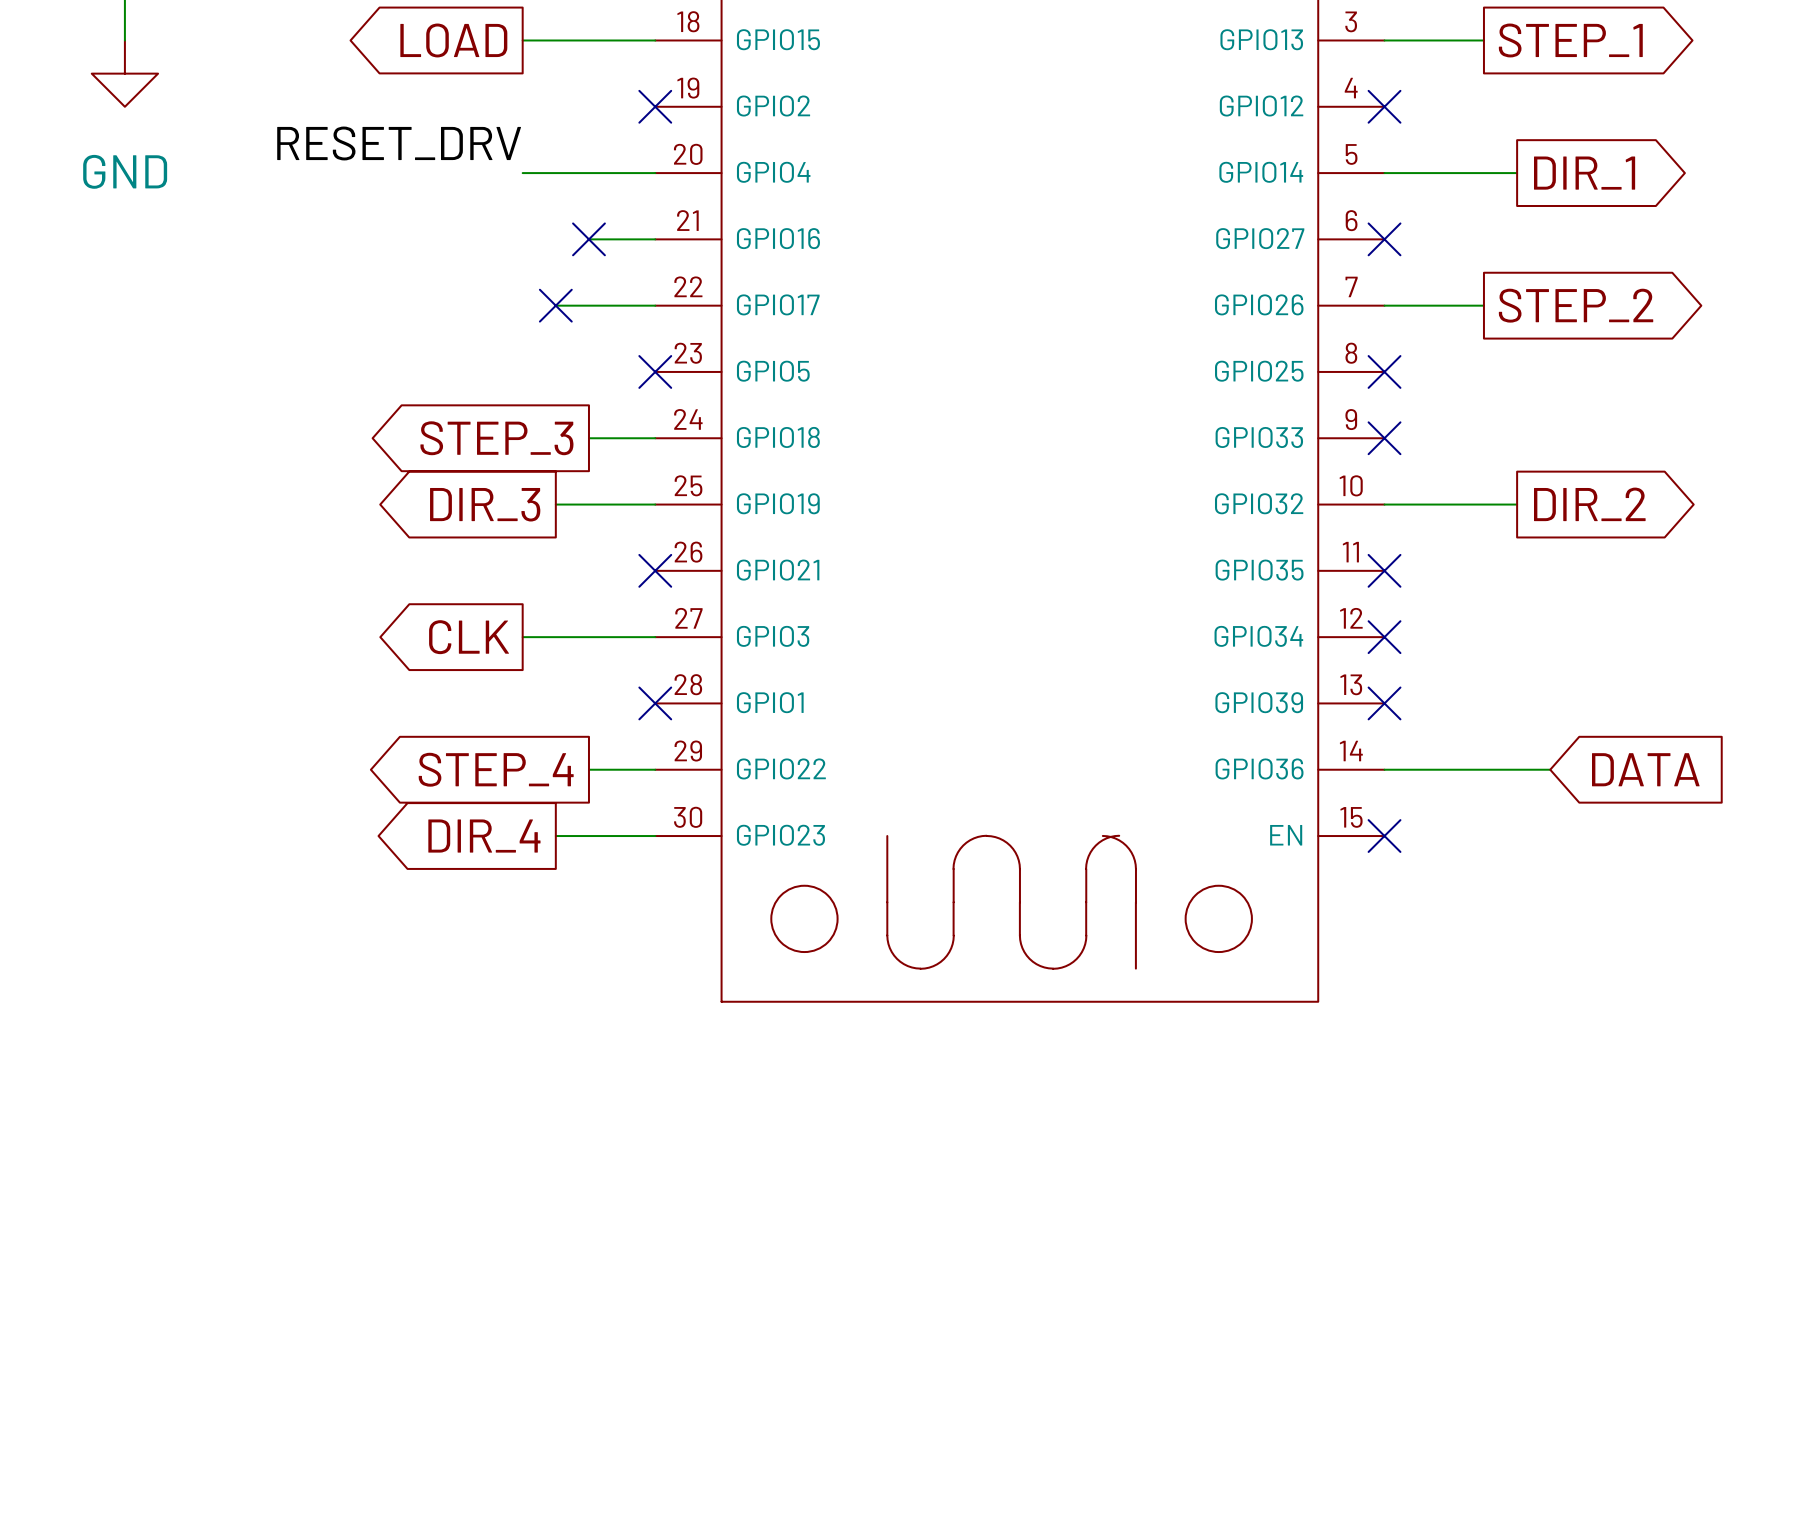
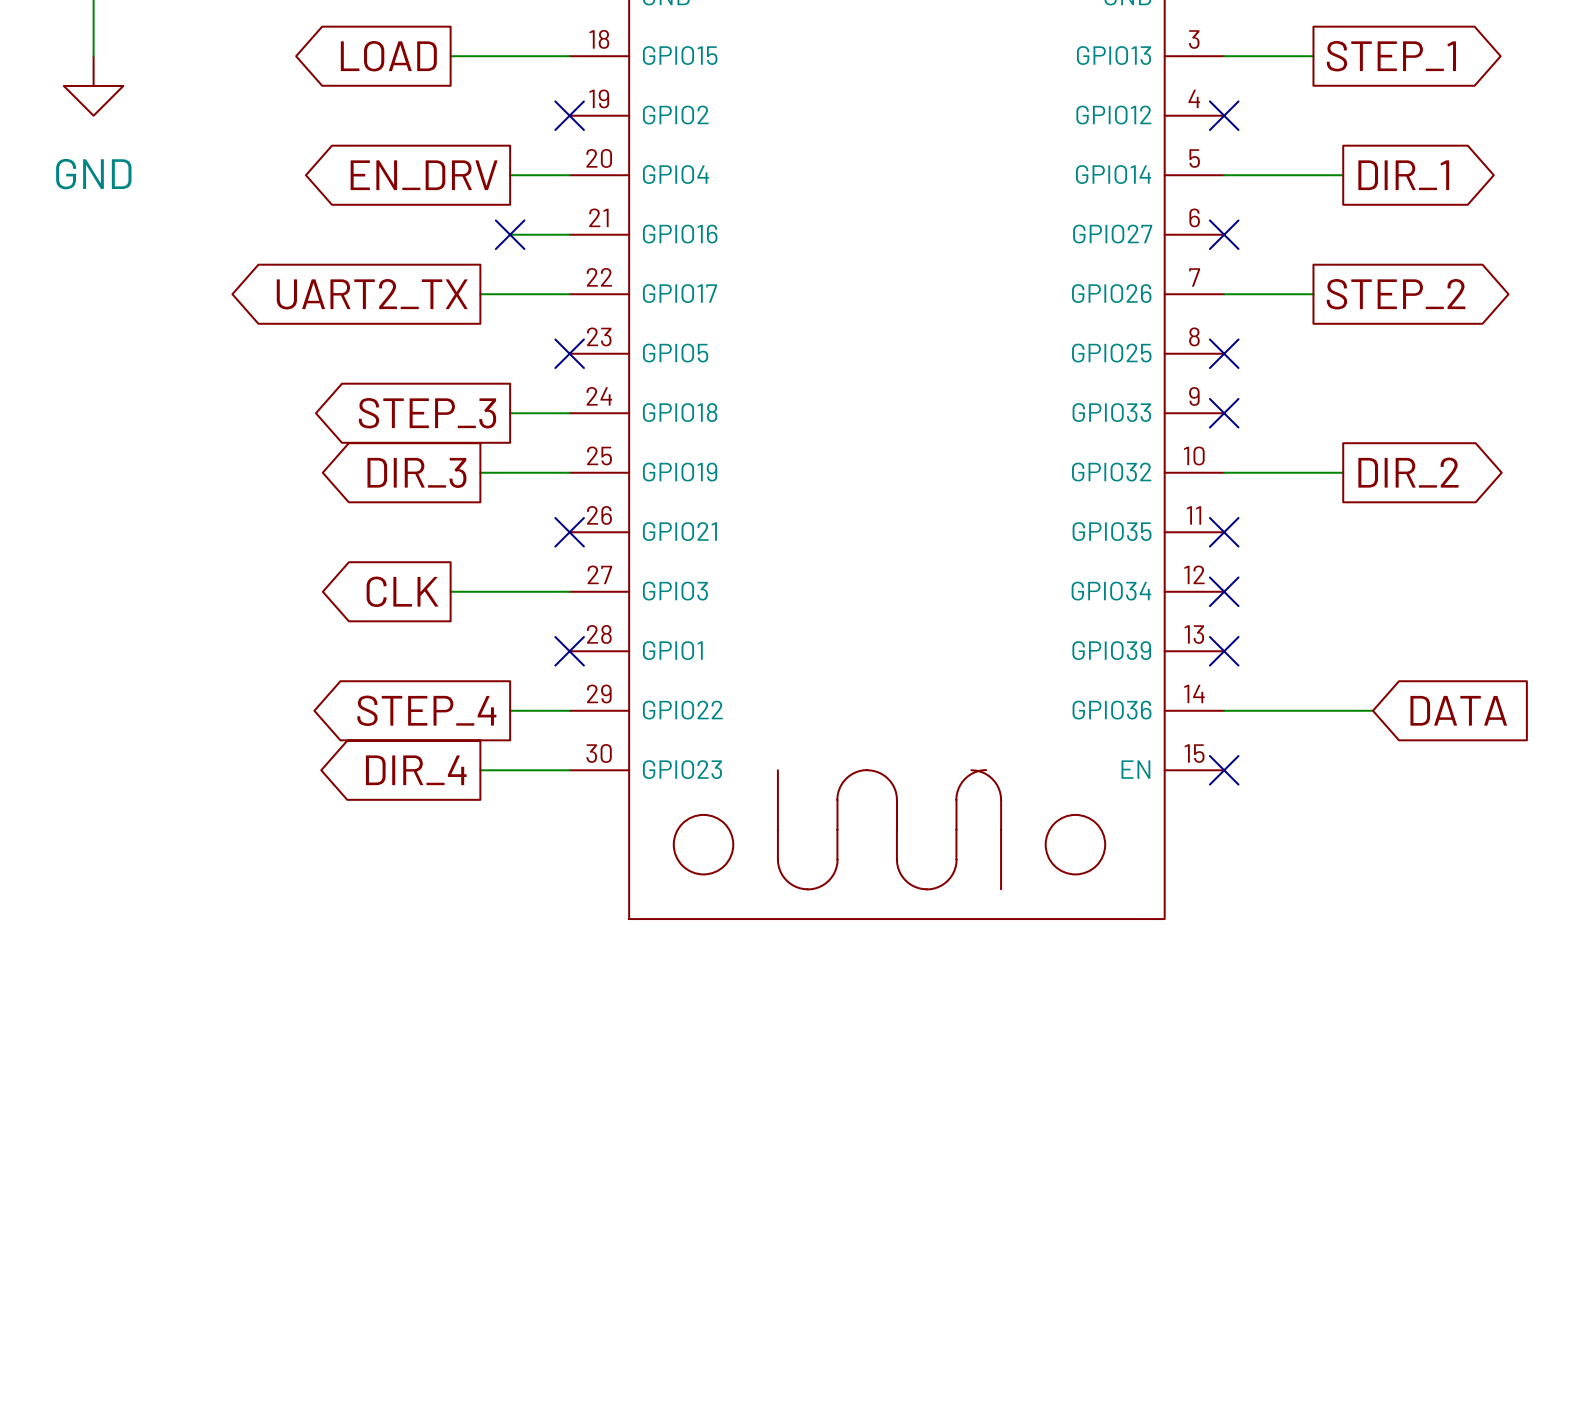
label: RESET_DRV (399, 143) -> none
global label: none -> EN_DRV (424, 175)
wire: (522, 173) (588, 173) -> none
global label: none -> UART2_TX (372, 294)
no-connect mark: (555, 305) -> none

